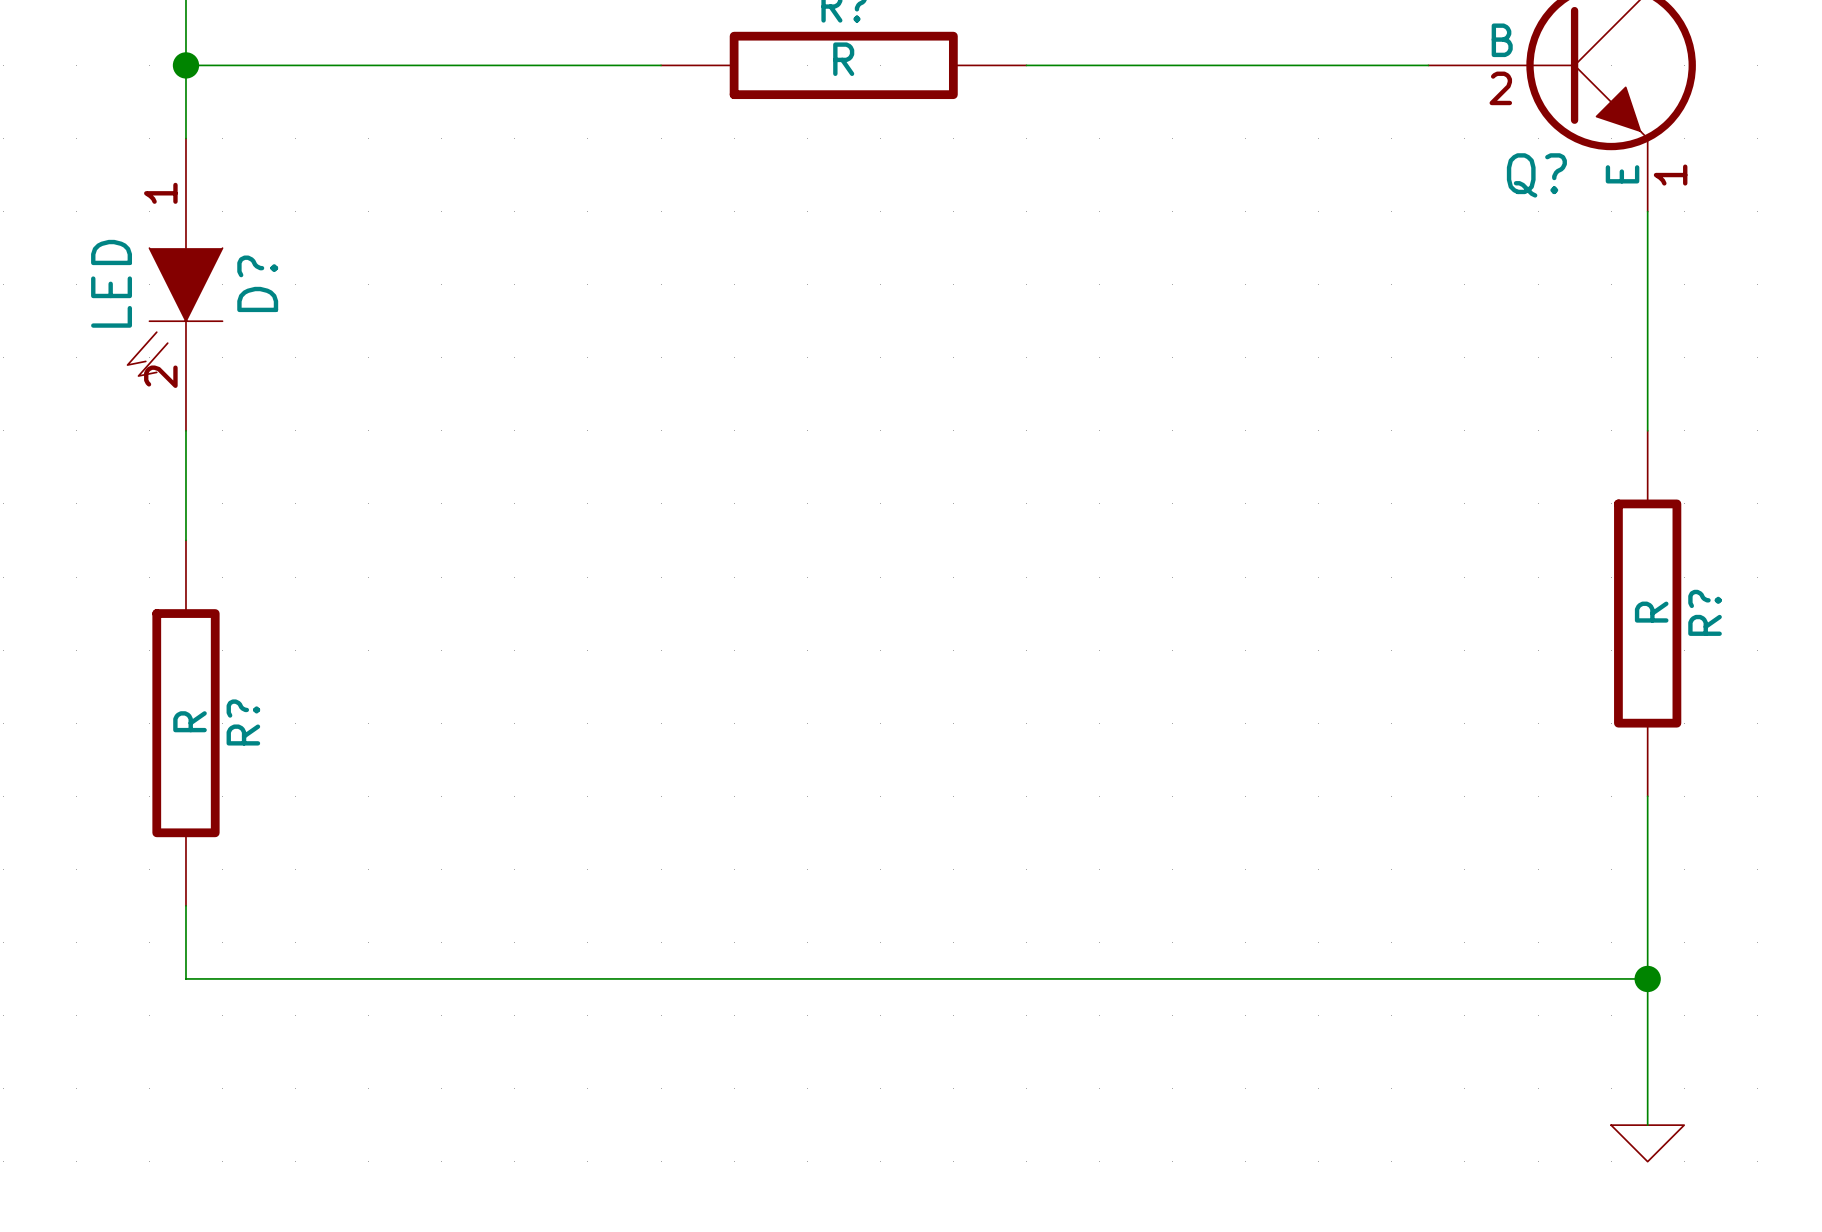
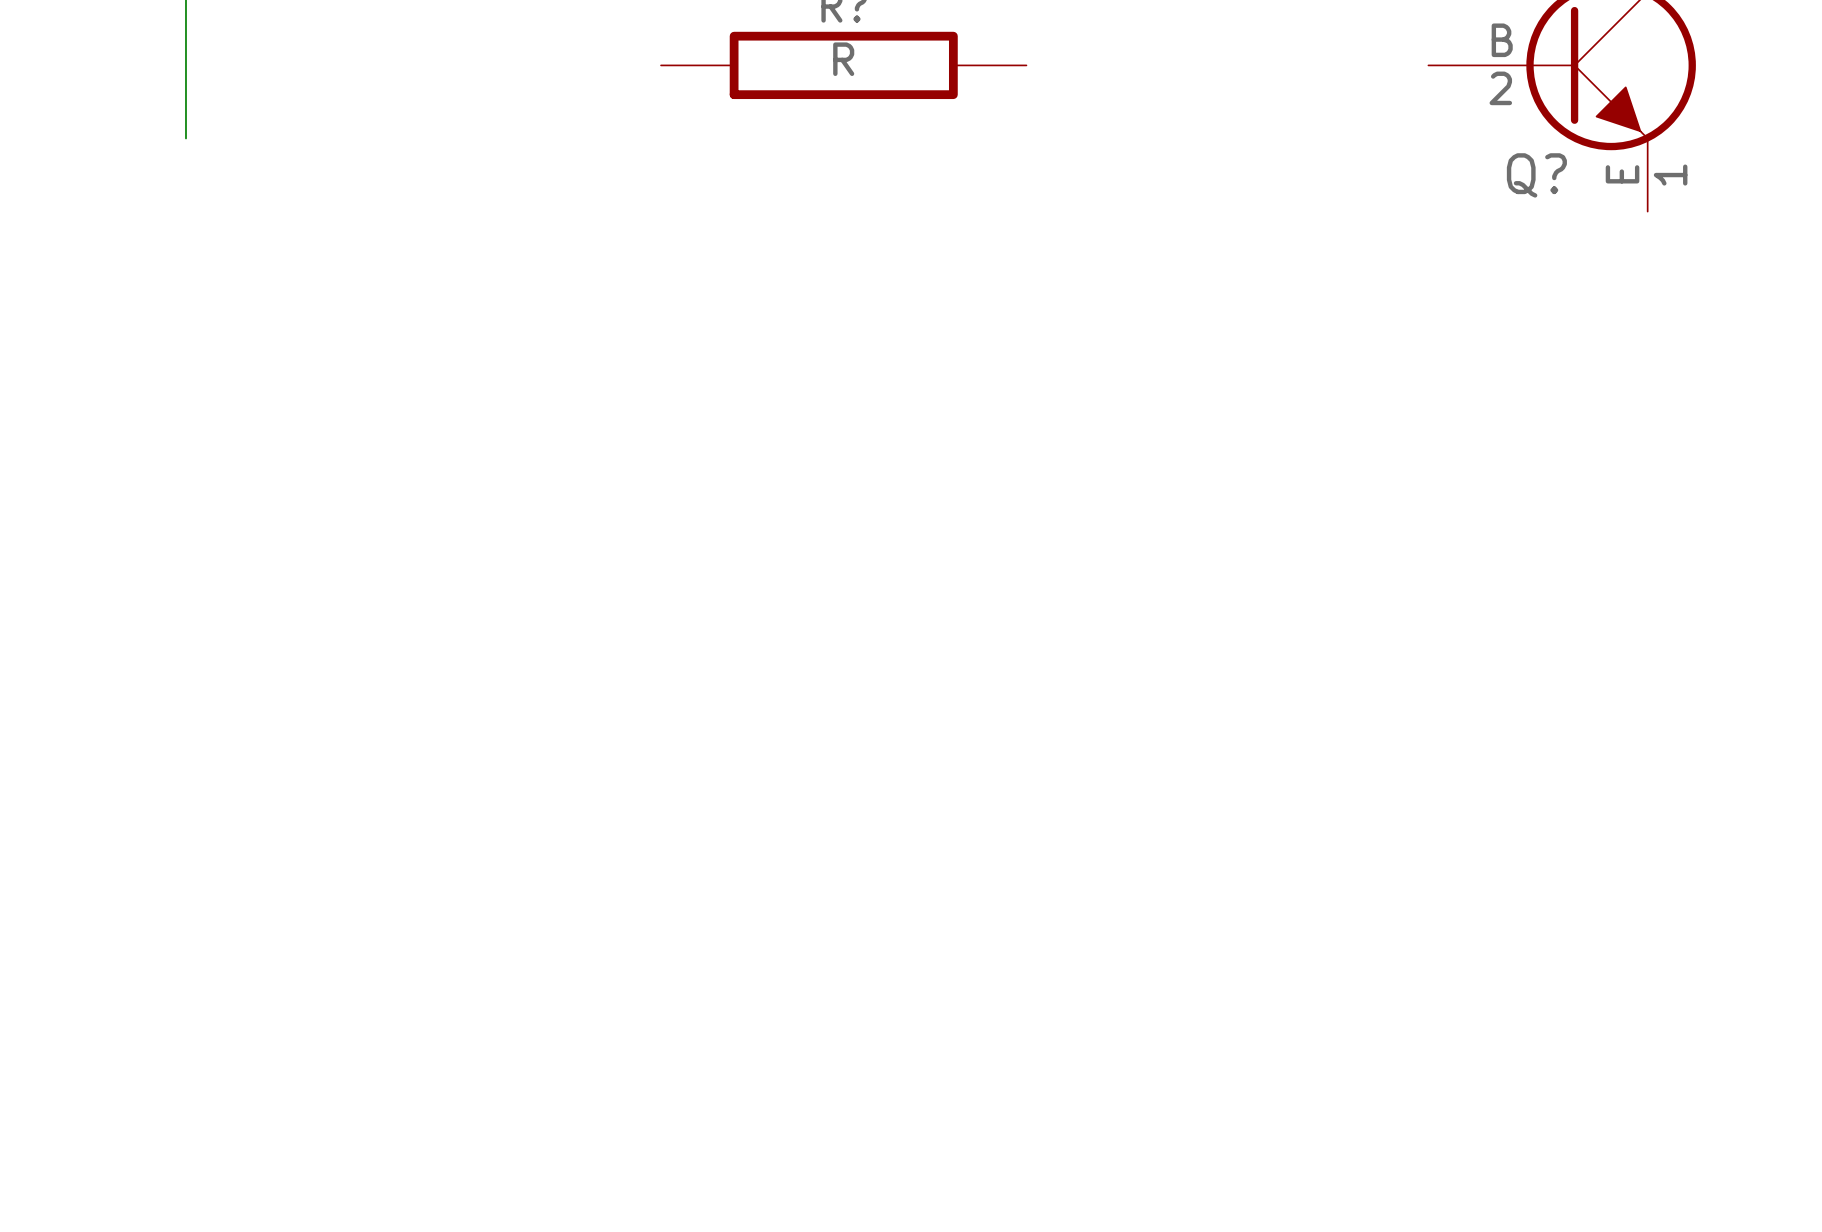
wire: (185, 65) (661, 65) -> none
junction: (185, 65) -> none
wire: (1026, 65) (1428, 65) -> none
wire: (1647, 211) (1647, 430) -> none
D?: LED (175, 284) -> none
wire: (185, 430) (185, 540) -> none
R?: R (1647, 613) -> none
R?: R (185, 723) -> none
wire: (1647, 796) (1647, 1125) -> none
wire: (185, 905) (185, 978) (1647, 978) -> none
junction: (1647, 978) -> none
power symbol: (1647, 1143) -> none

